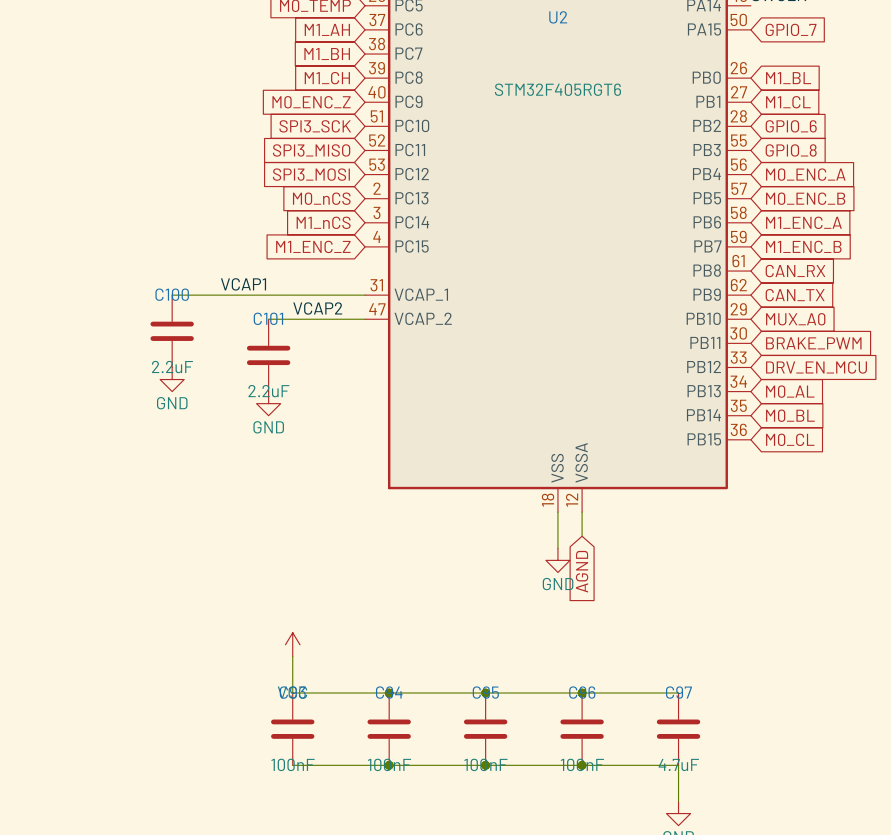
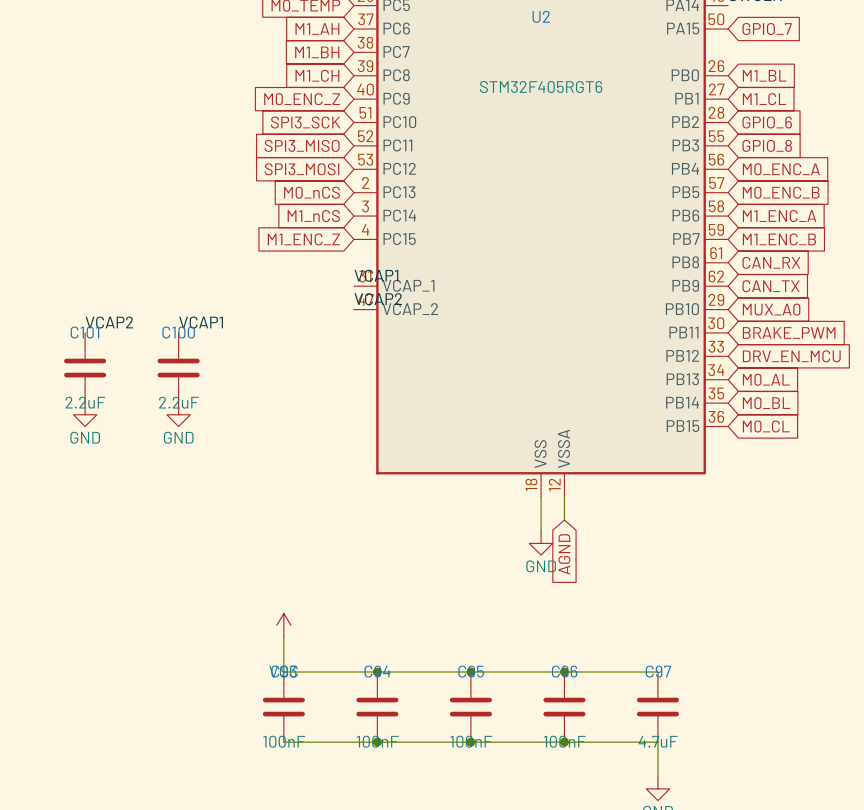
label position: VCAP1 (243, 284) -> VCAP1 (201, 322)
label: none -> VCAP1 (376, 275)
wire: (172, 295) (365, 295) -> none
label position: VCAP2 (317, 308) -> VCAP2 (378, 299)
wire: (268, 319) (365, 319) -> none
C100 position: (172, 331) -> (178, 368)
label: none -> VCAP2 (109, 322)
C101 position: (268, 355) -> (85, 368)
power symbol: GND (172, 379) -> none
power symbol: GND (268, 403) -> none
power symbol: none -> GND (85, 414)
power symbol: none -> GND (178, 414)

